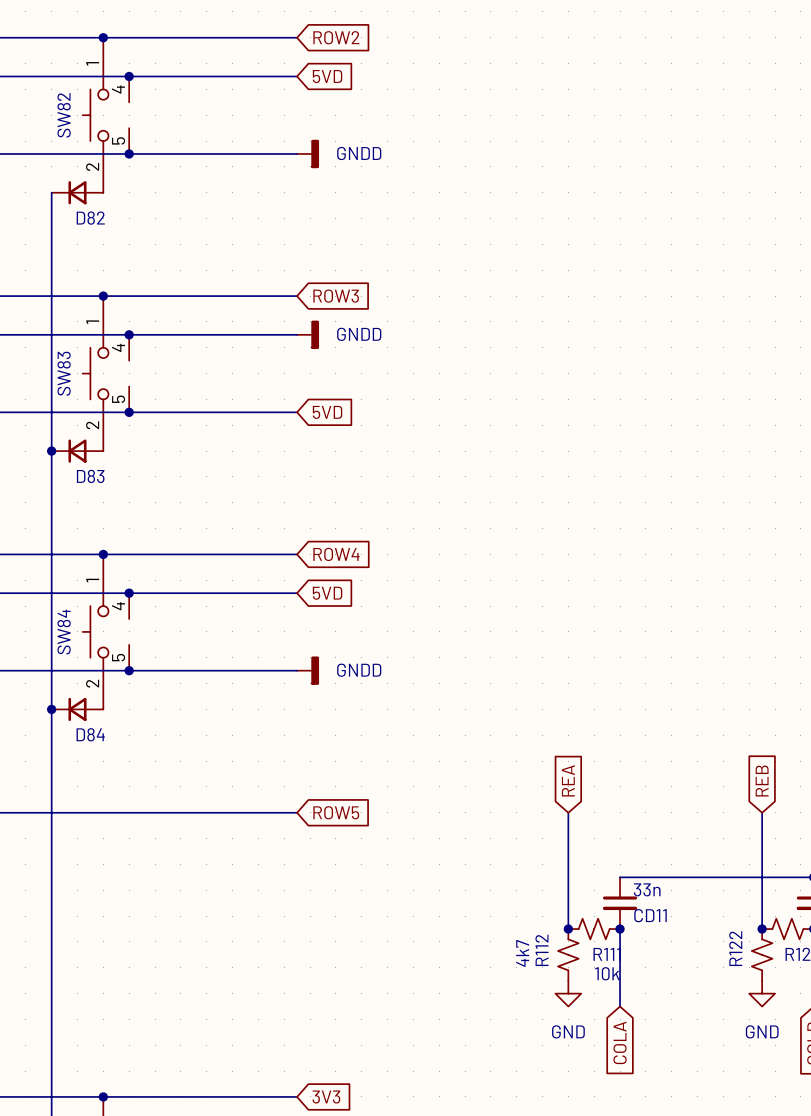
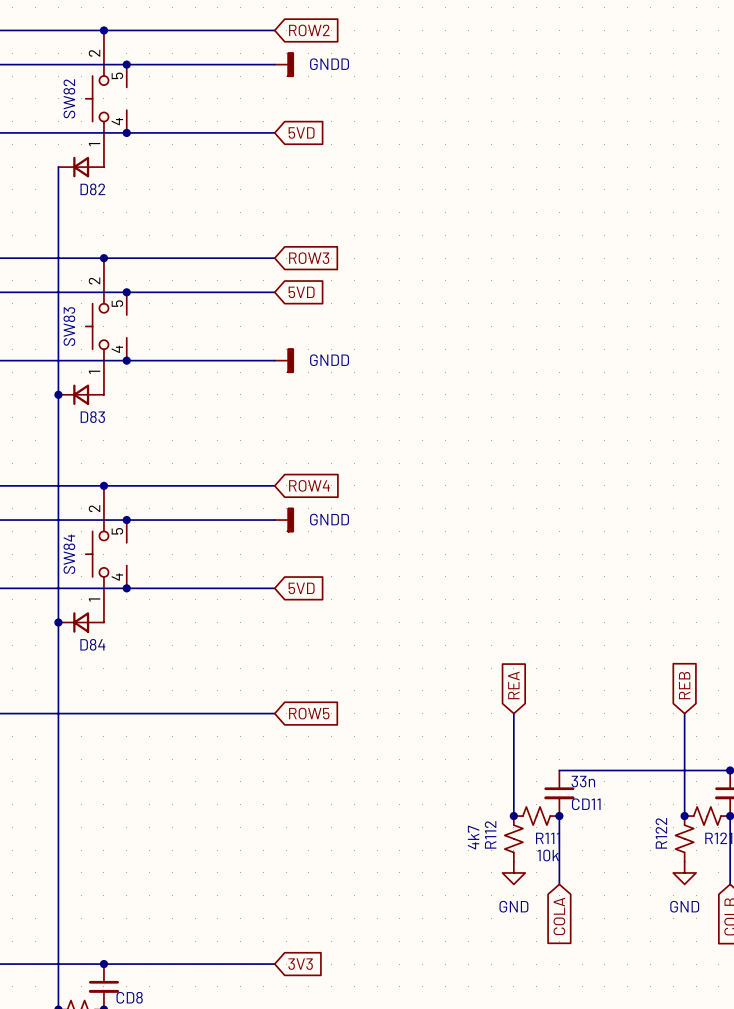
global label position: 5VD (327, 76) -> 5VD (301, 132)
SW82 flip: as is (95, 115) -> up-down (97, 98)
power symbol position: GNDD (308, 153) -> GNDD (284, 64)
power symbol position: GNDD (308, 334) -> GNDD (284, 360)
SW83 flip: as is (95, 373) -> up-down (97, 326)
global label position: 5VD (327, 412) -> 5VD (301, 292)
global label position: 5VD (327, 593) -> 5VD (301, 588)
SW84 flip: as is (95, 631) -> up-down (97, 554)
power symbol position: GNDD (308, 670) -> GNDD (284, 520)

